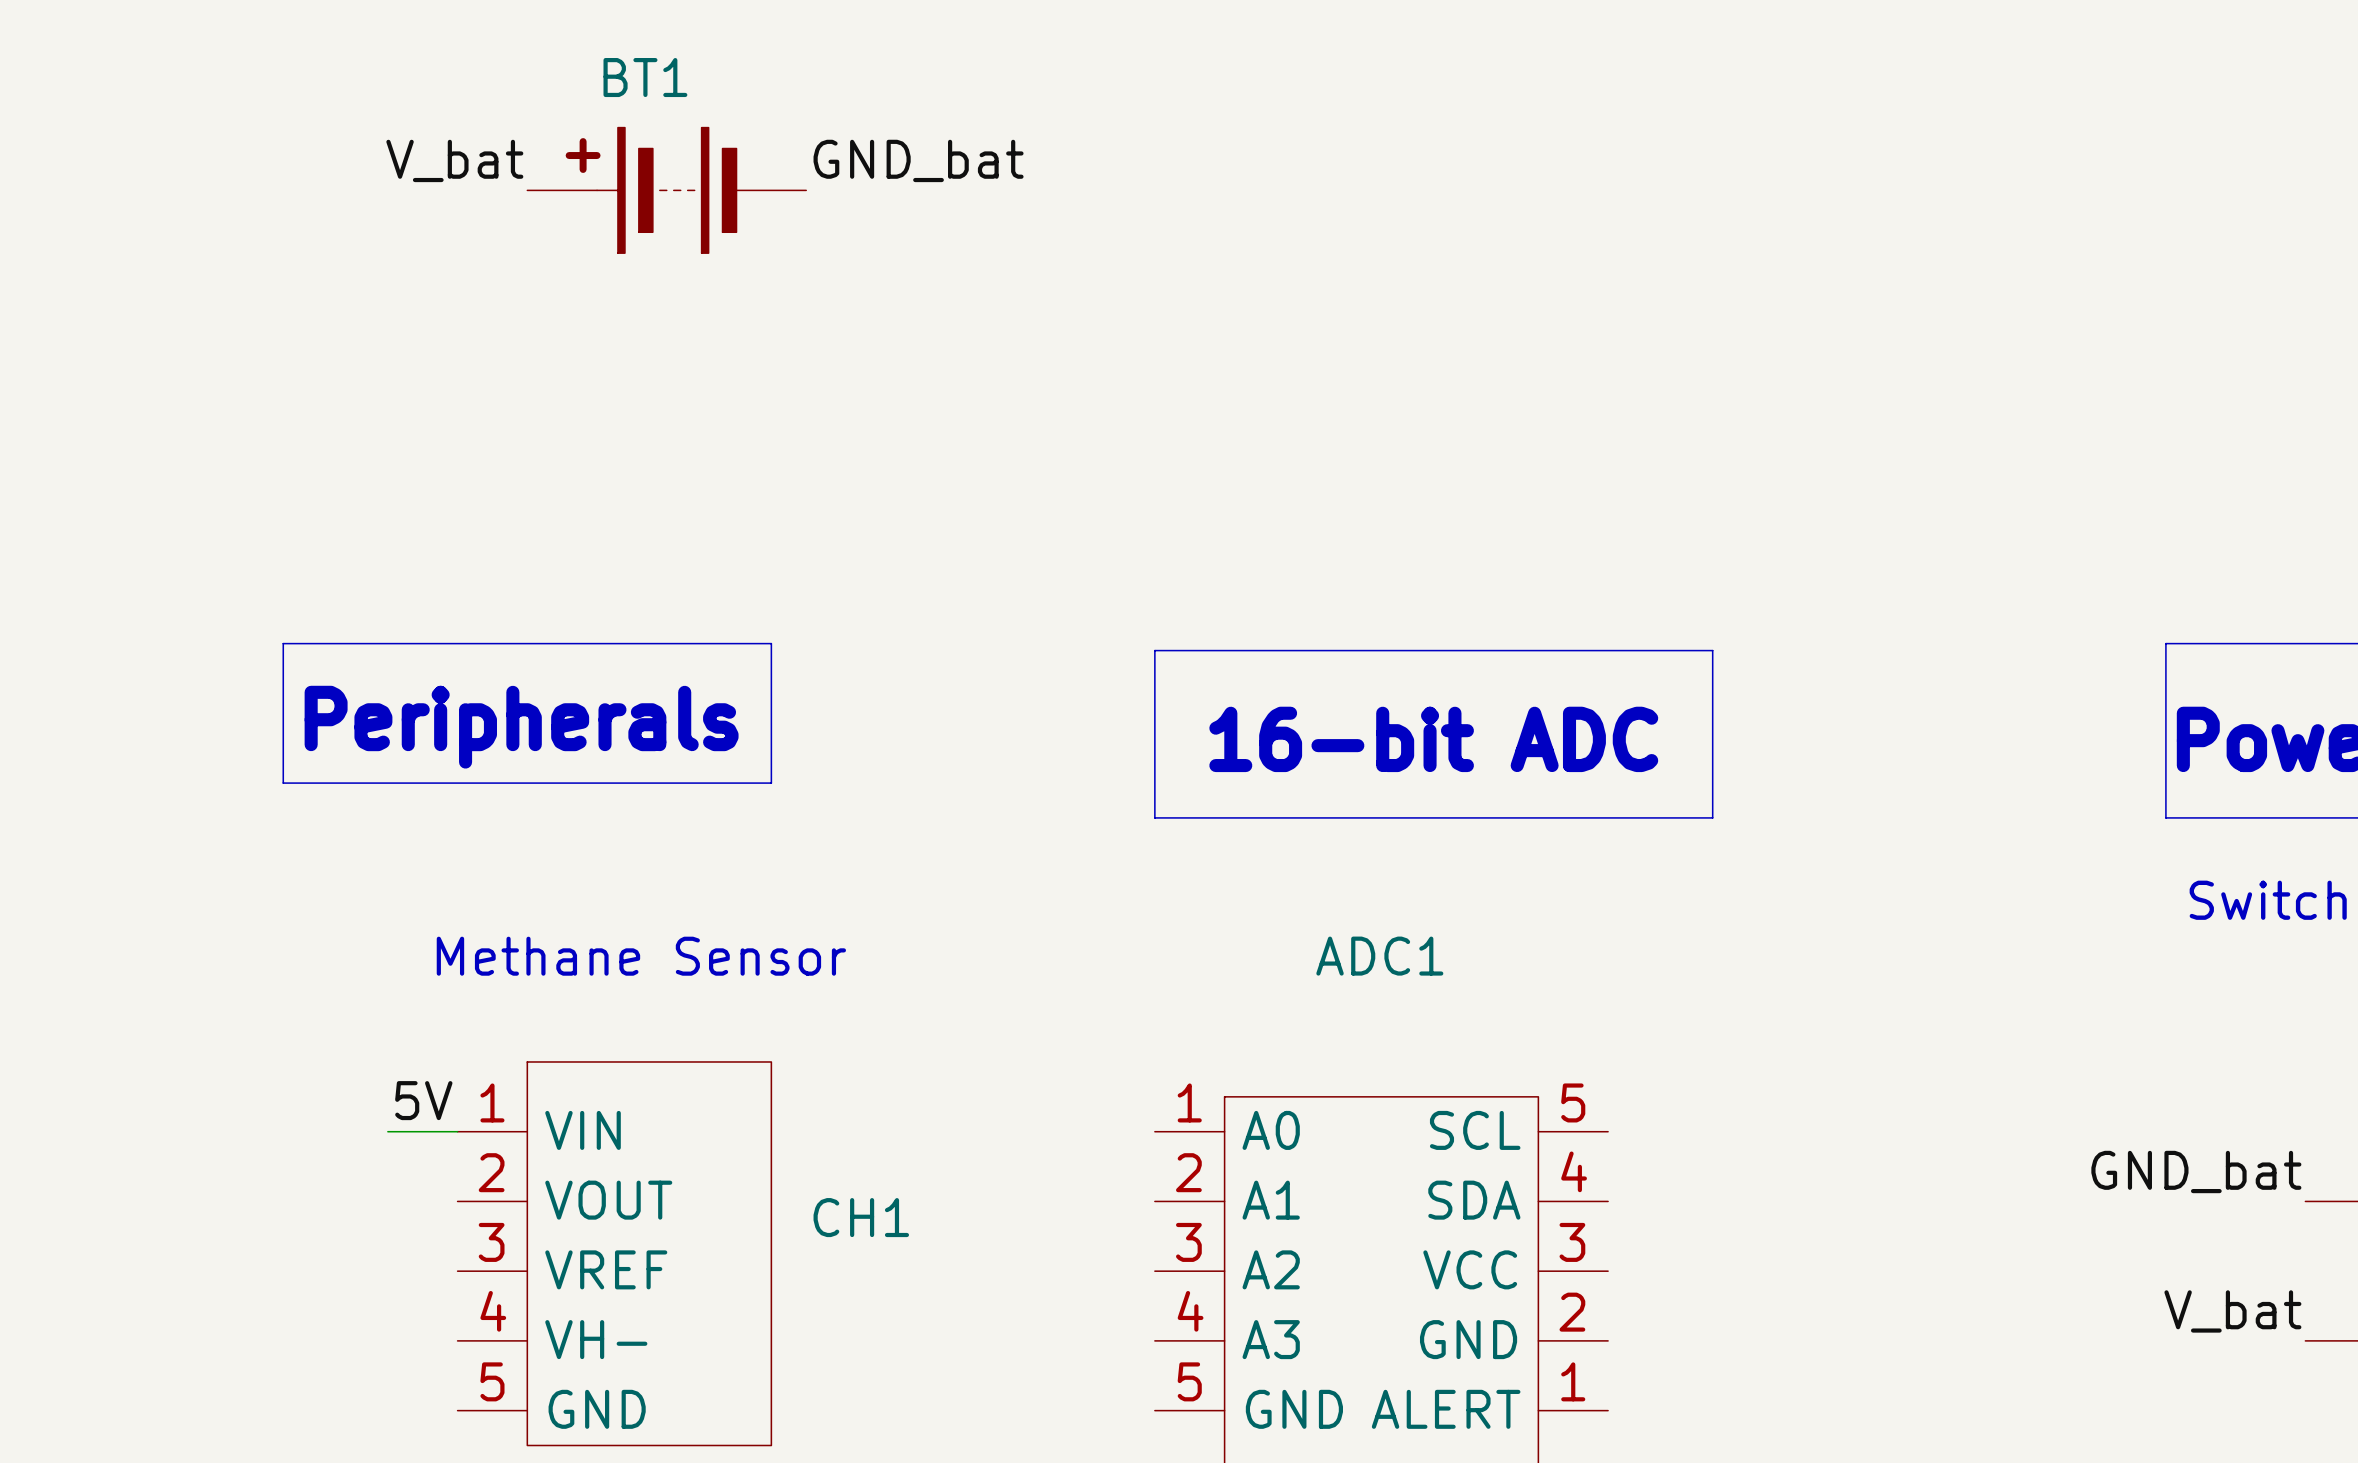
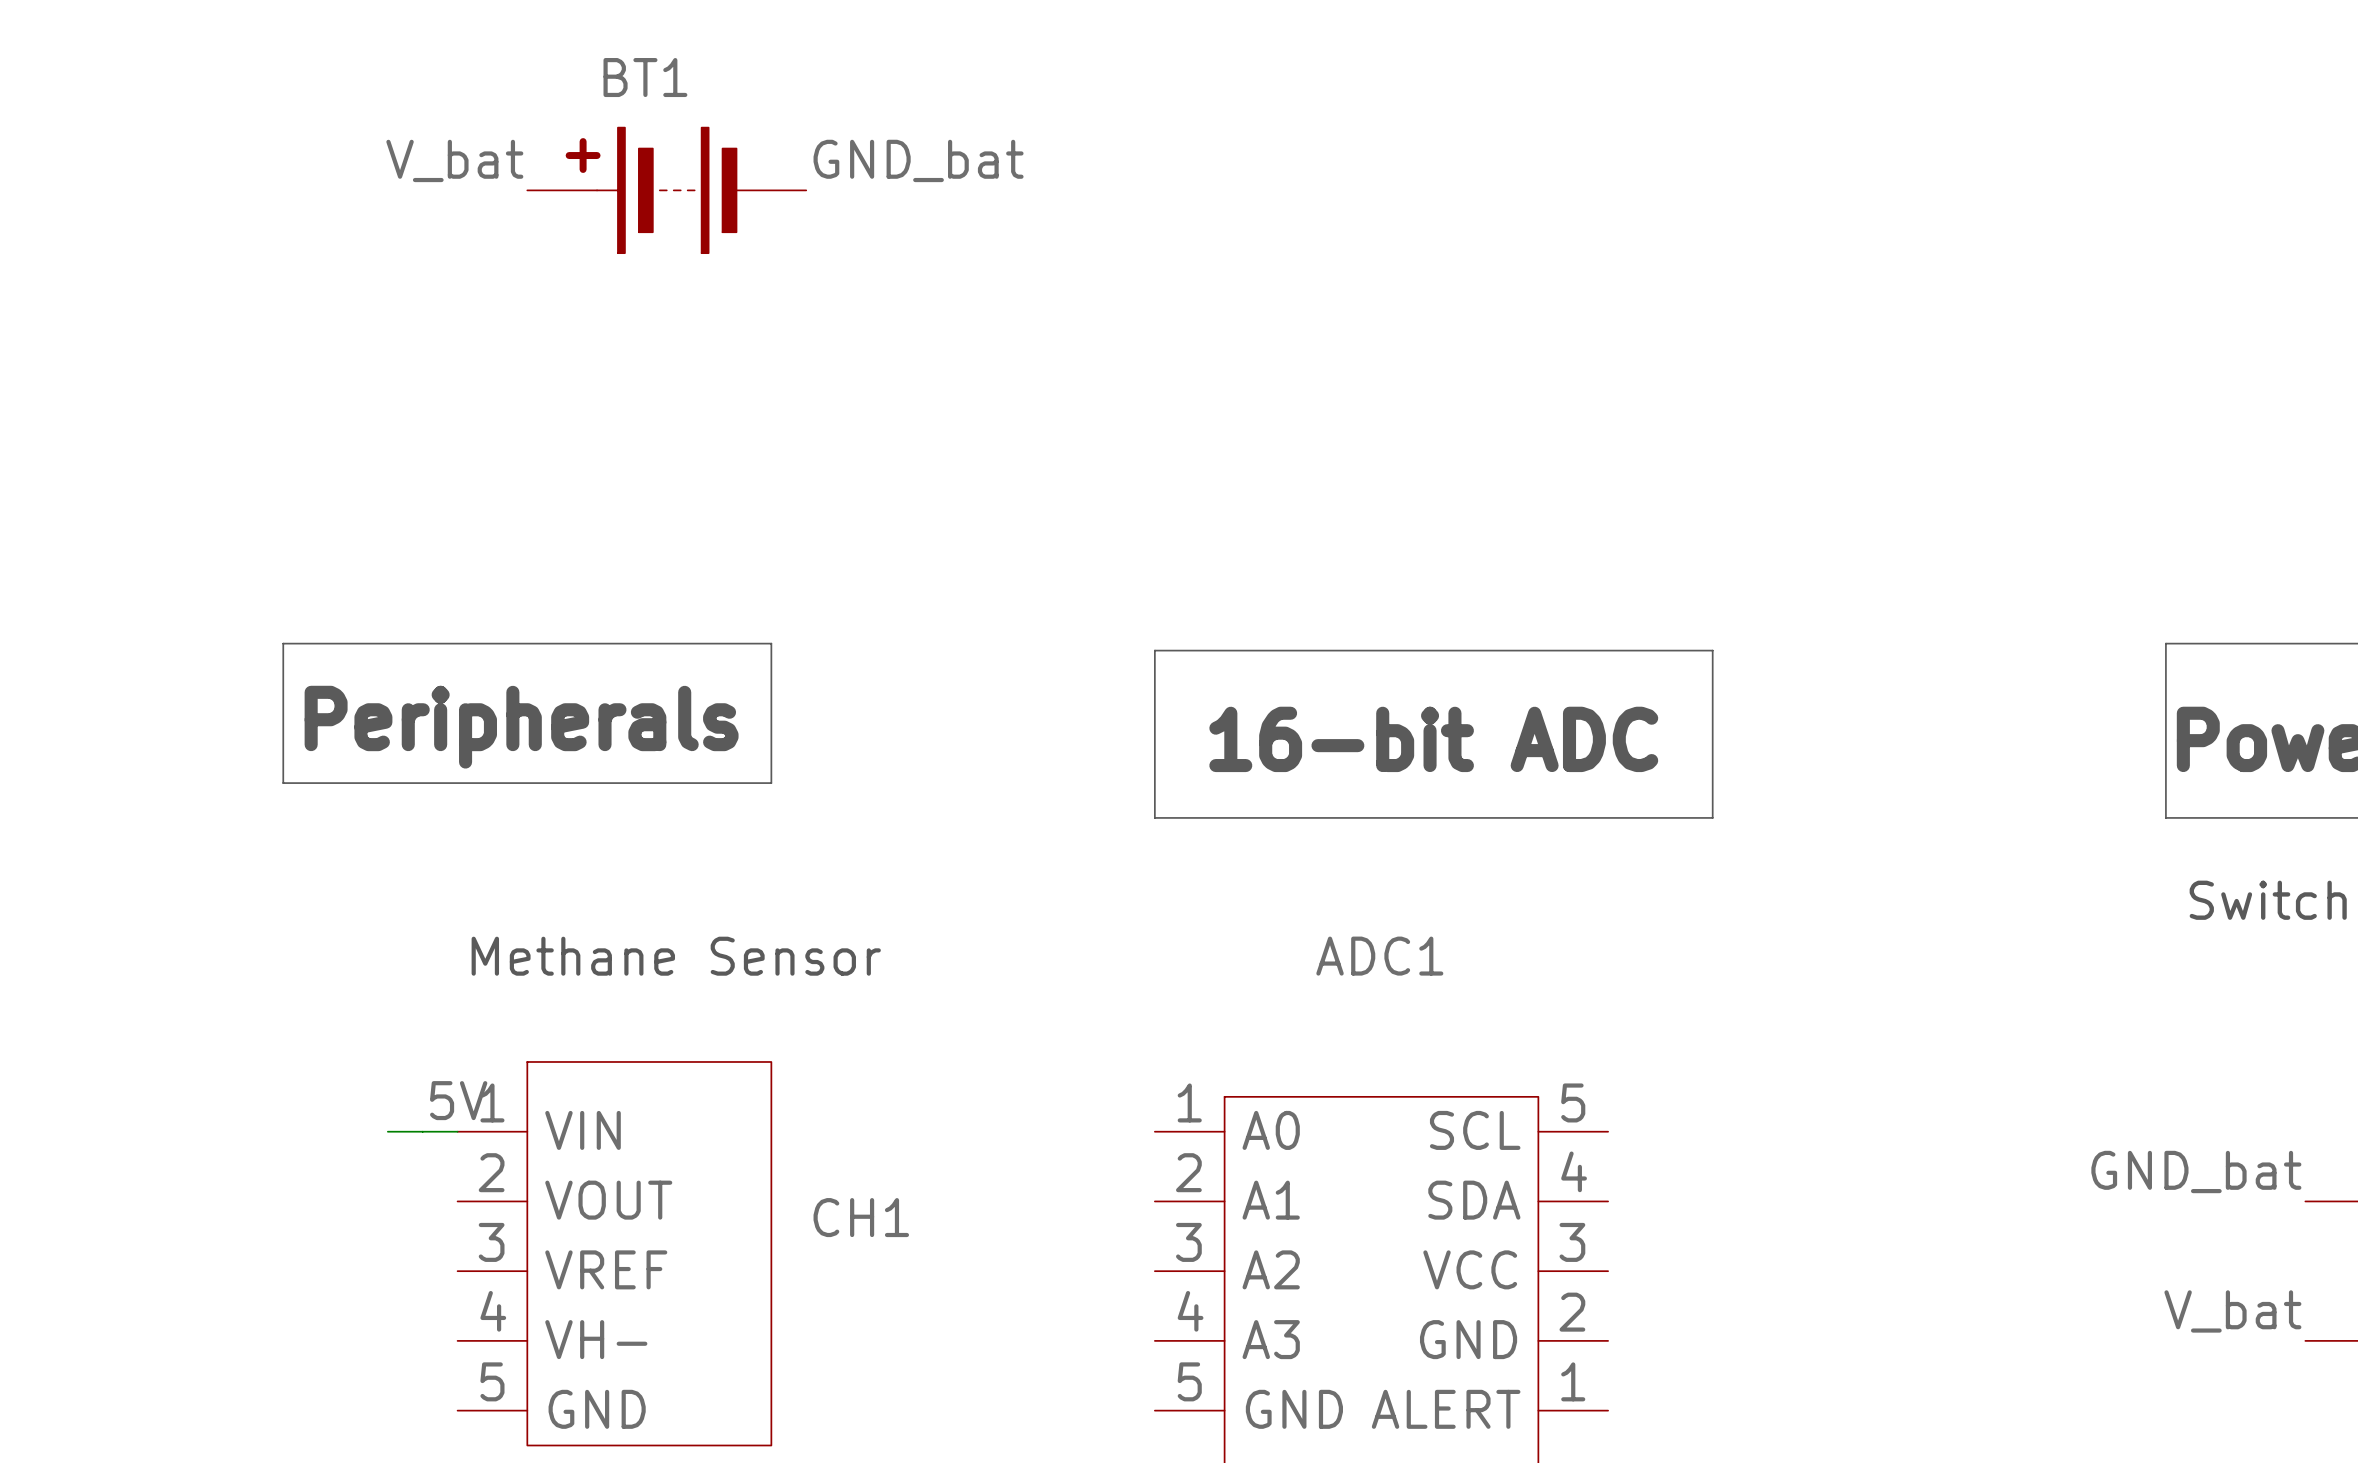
text position: Methane Sensor (641, 956) -> Methane Sensor (676, 956)
label position: 5V (423, 1100) -> 5V (458, 1100)

